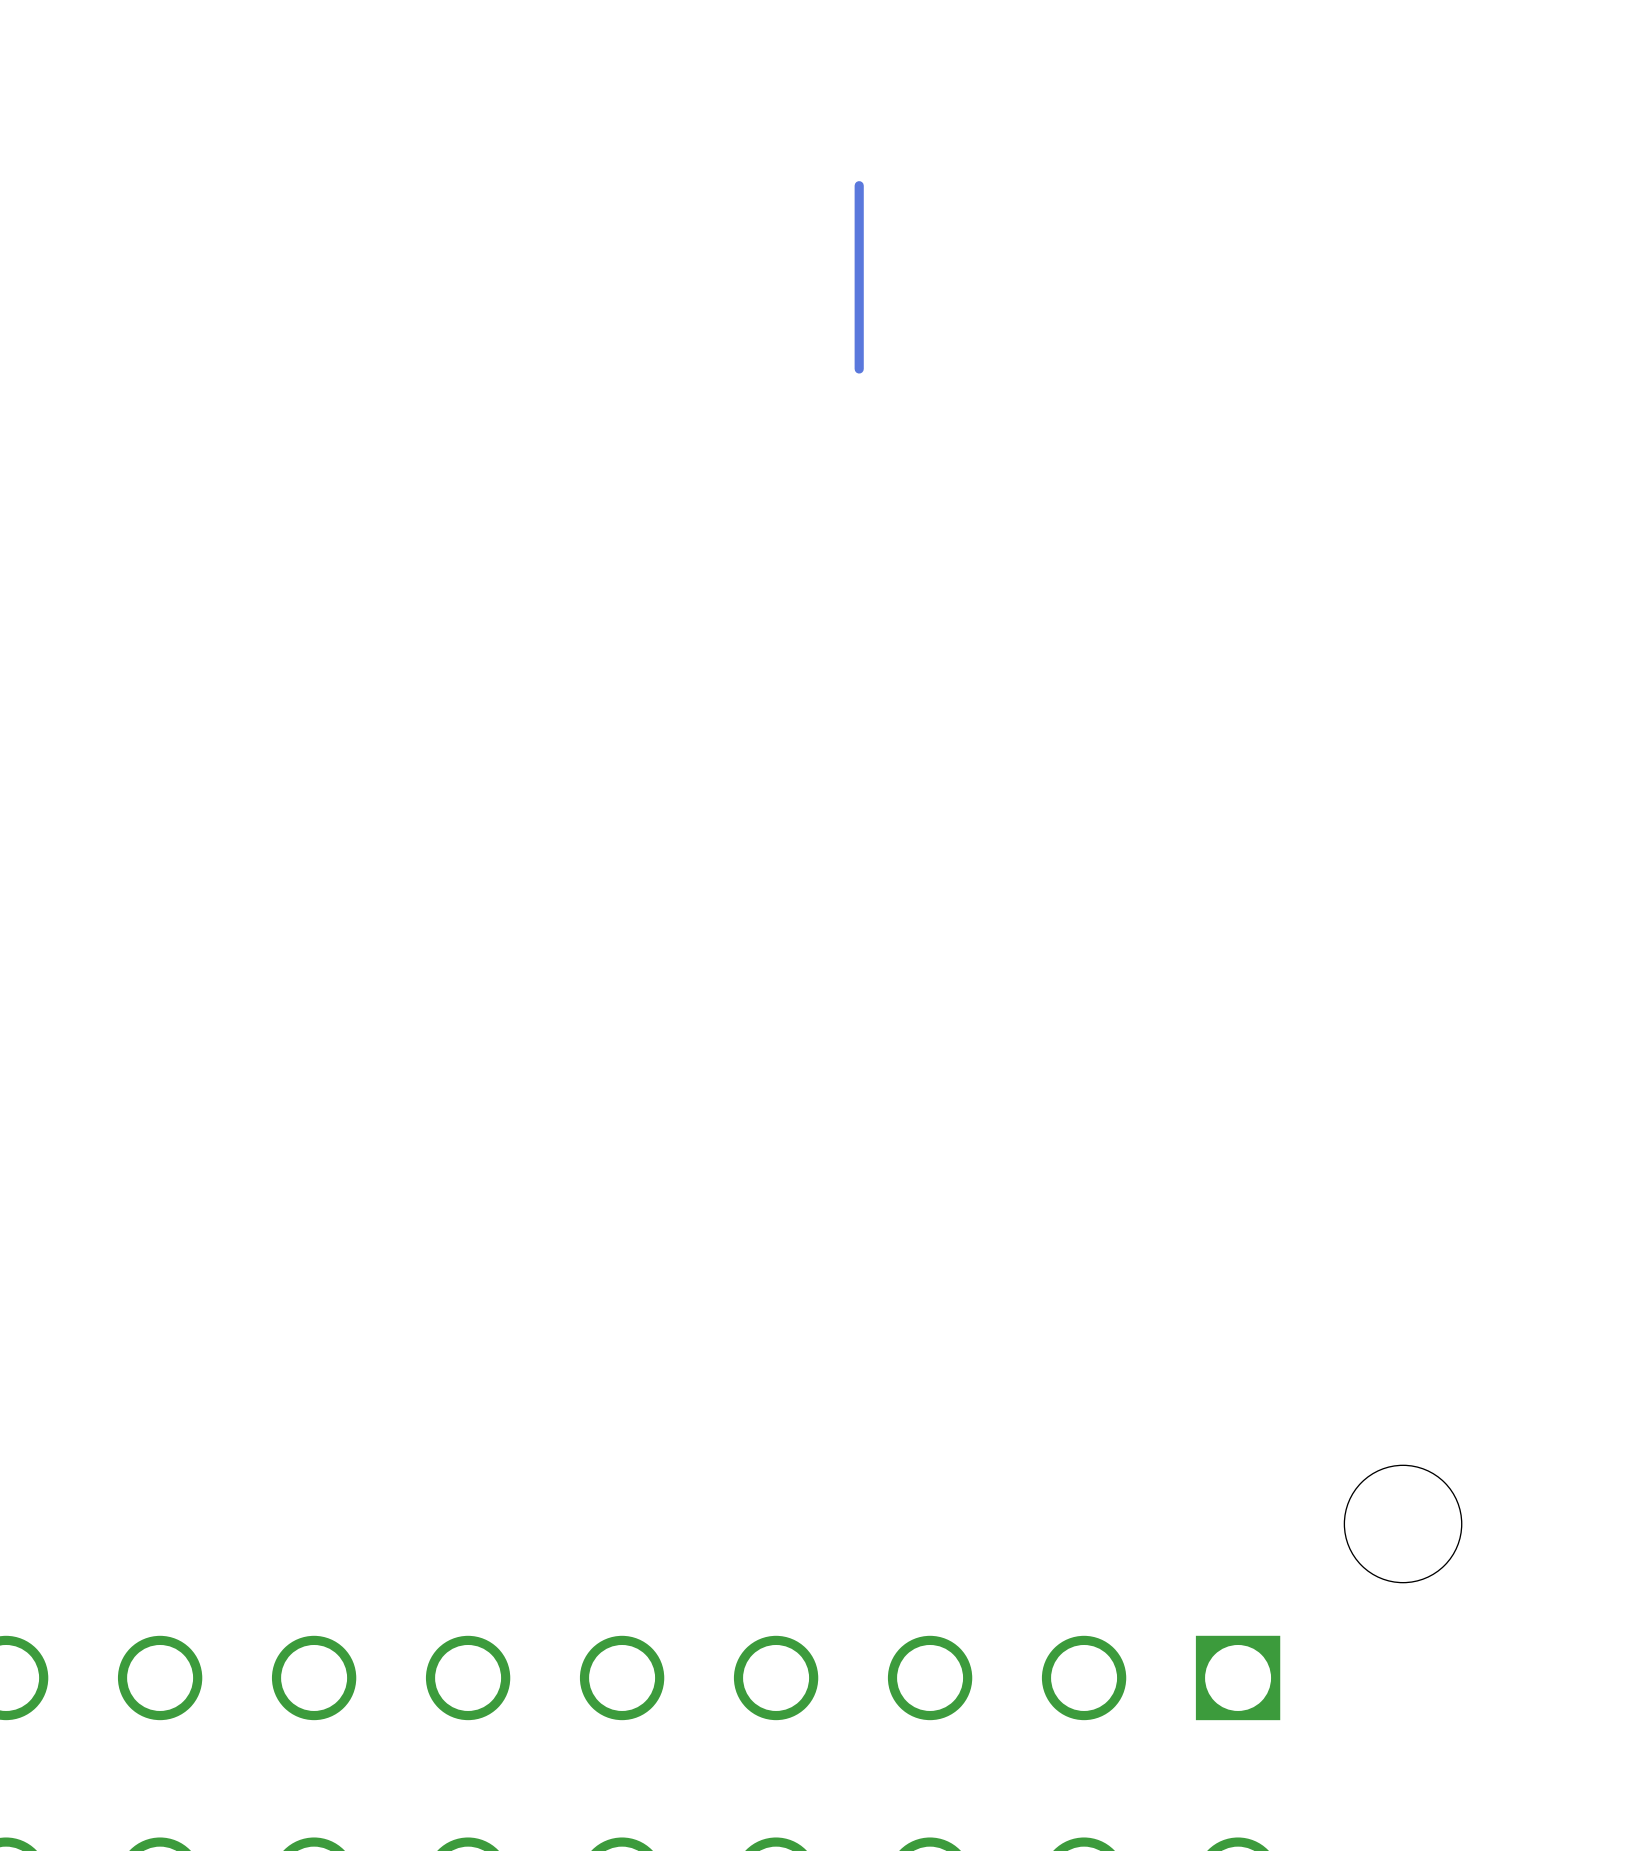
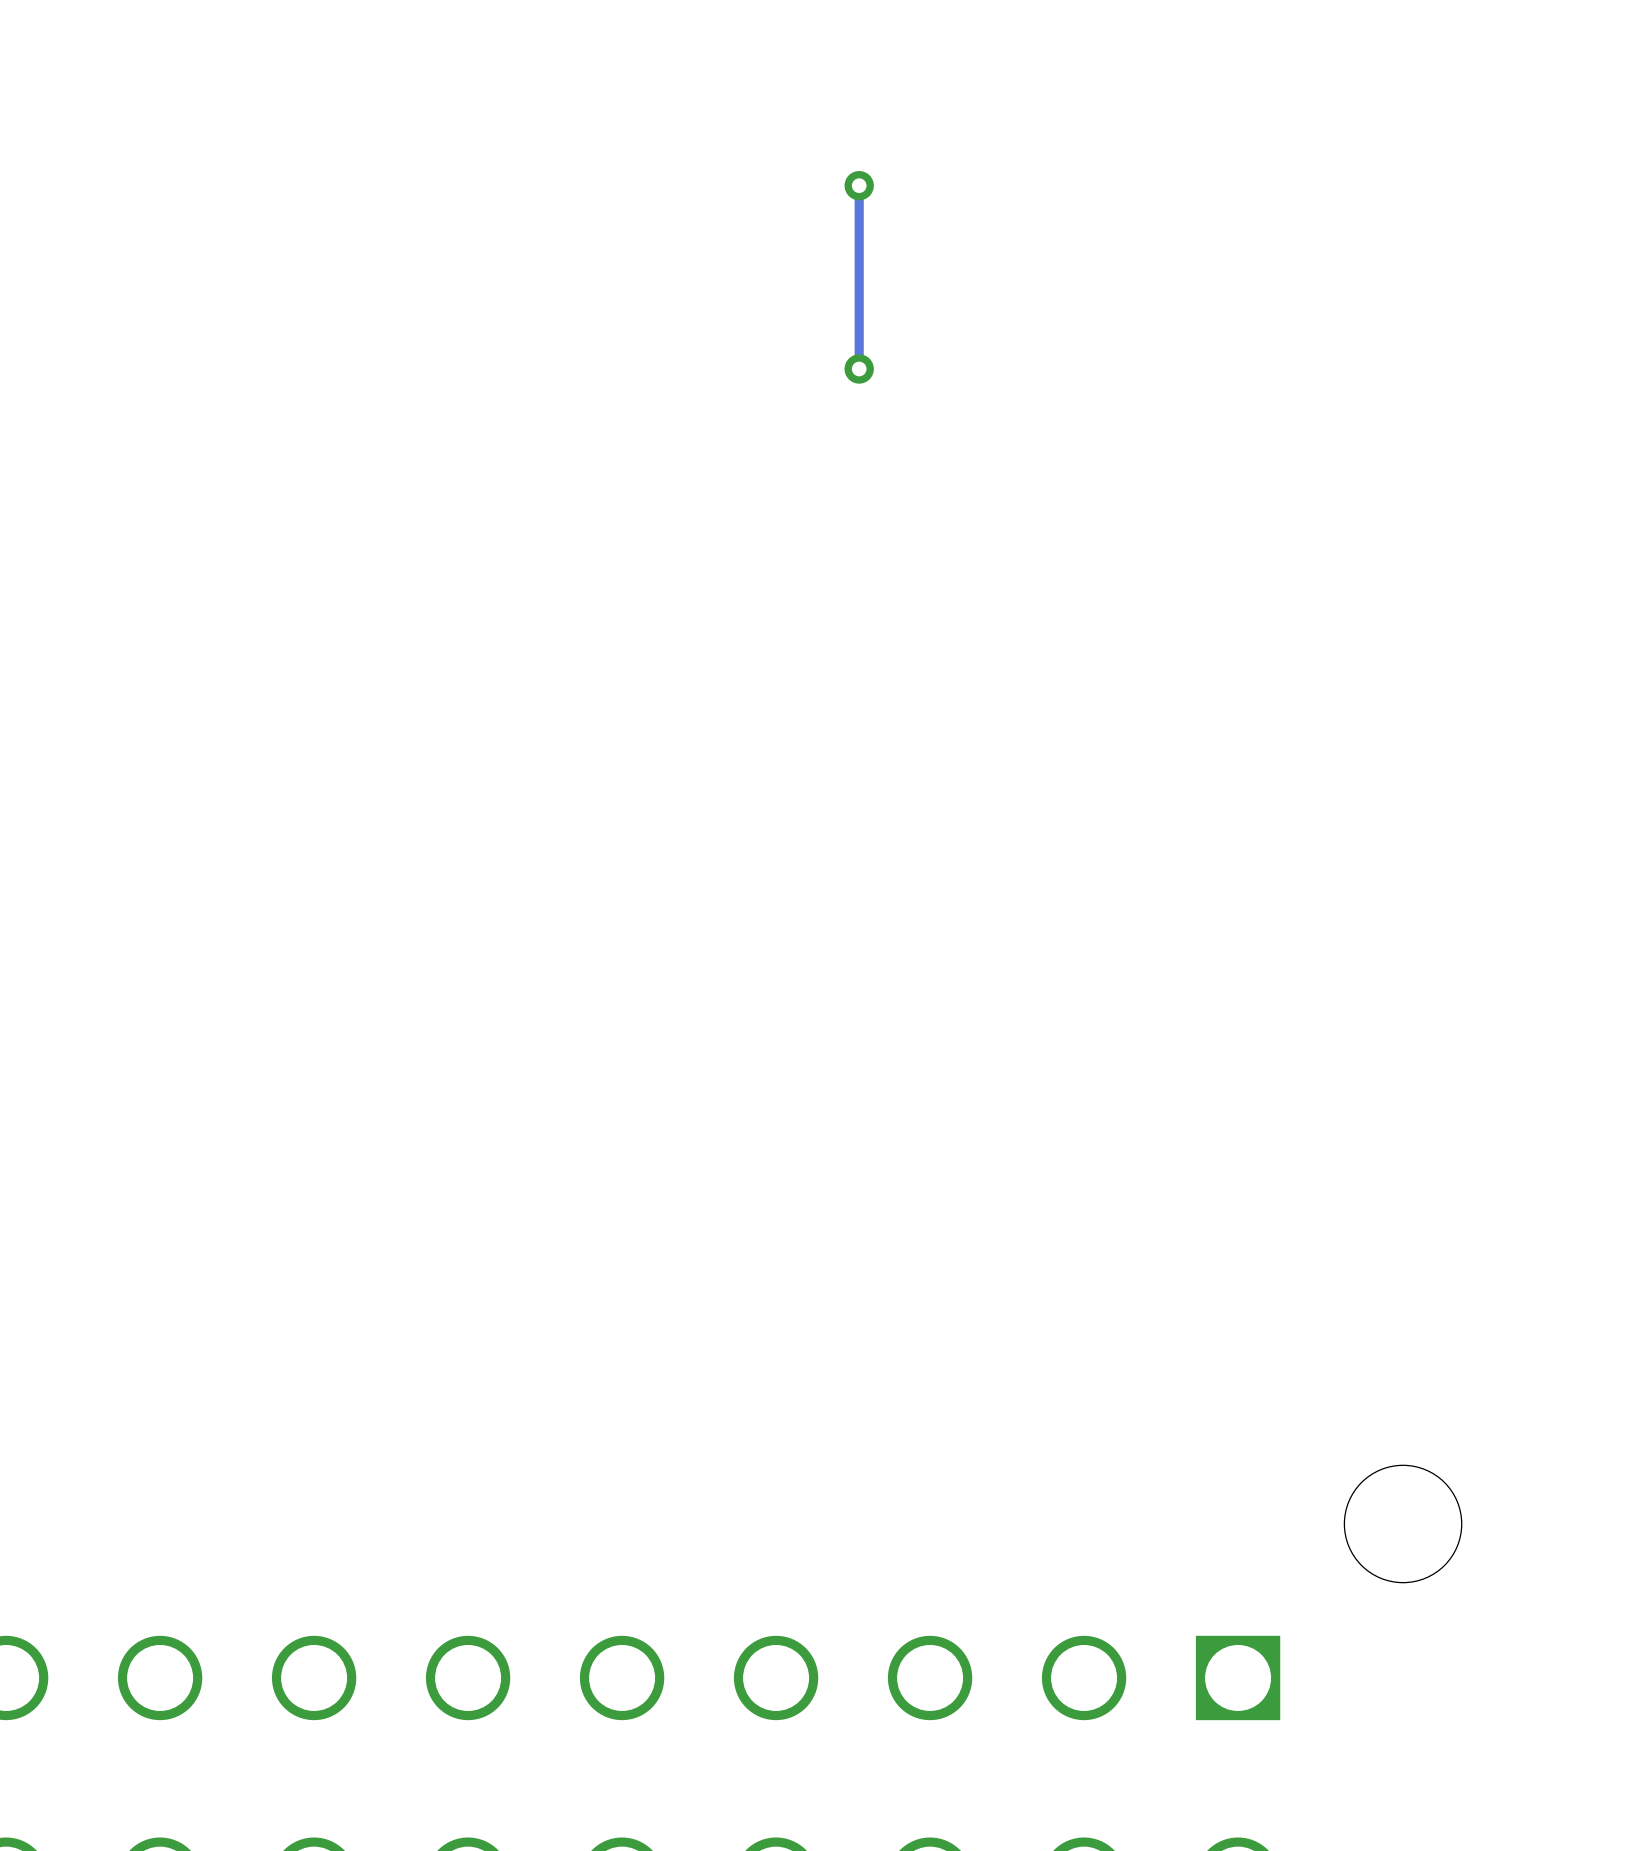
via: none -> (859, 185)
via: none -> (859, 369)

